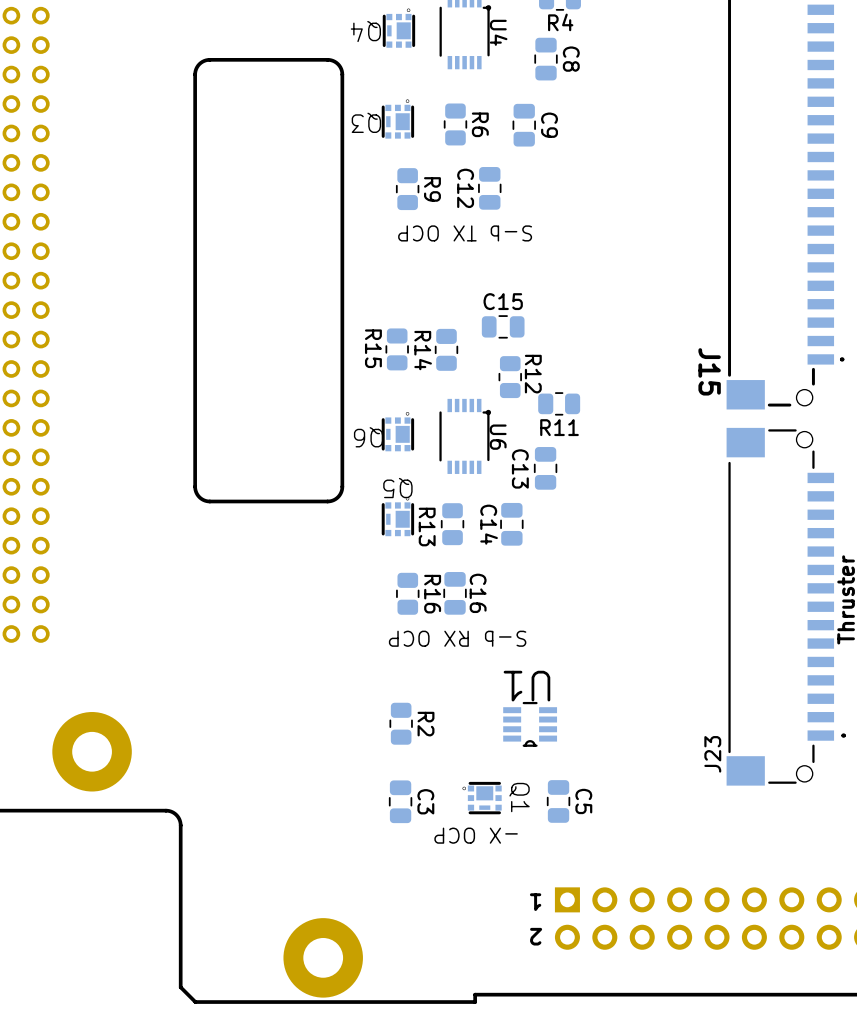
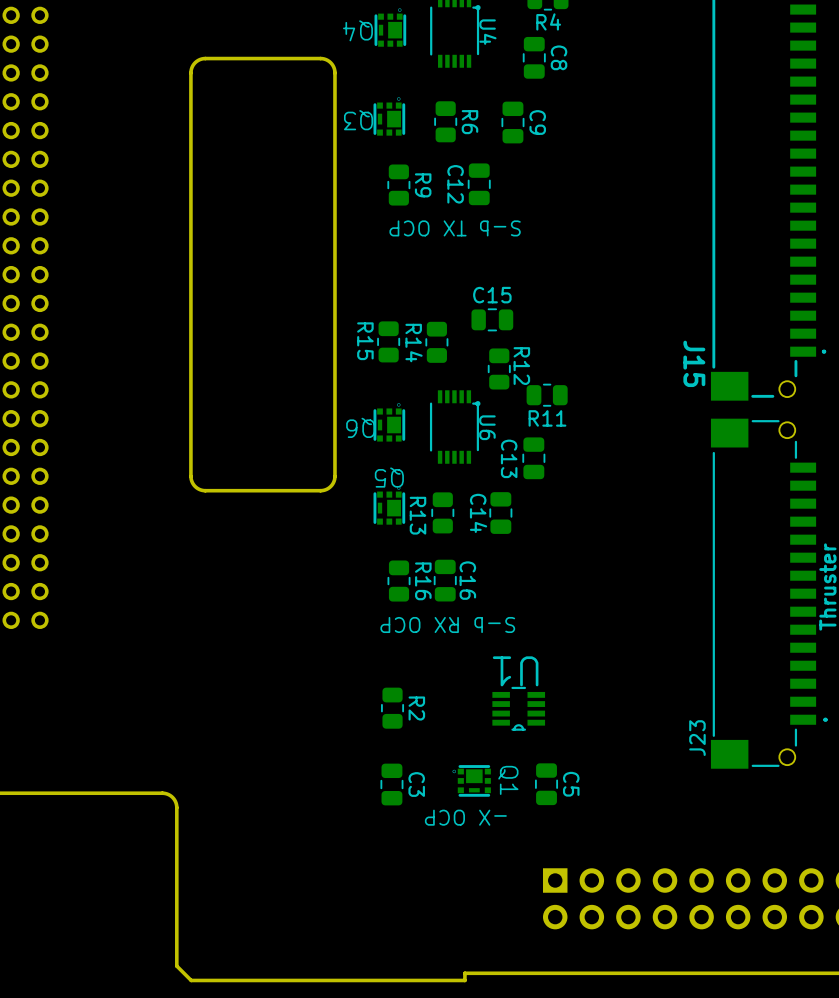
part: (92, 751) -> none
text: 1 (535, 902) -> none
text: 2 (536, 936) -> none
part: (323, 957) -> none

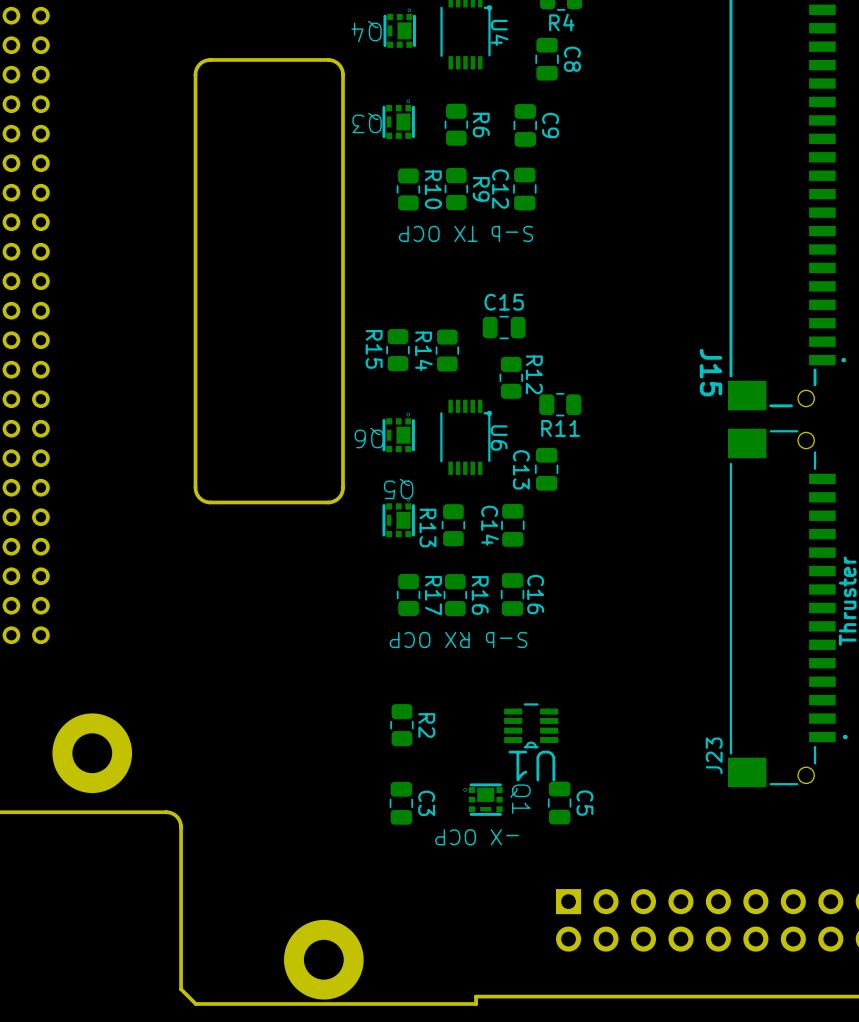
R9: none -> (456, 189)
C12 position: (479, 184) -> (524, 189)
R9 name: R9 (423, 185) -> R10 (433, 189)
C16 position: (445, 580) -> (512, 594)
R16 name: R16 (423, 581) -> R17 (433, 595)
R16: none -> (455, 595)
U1 name position: U1 (515, 671) -> U1 (531, 766)
part: none -> (92, 753)
part: none -> (323, 959)

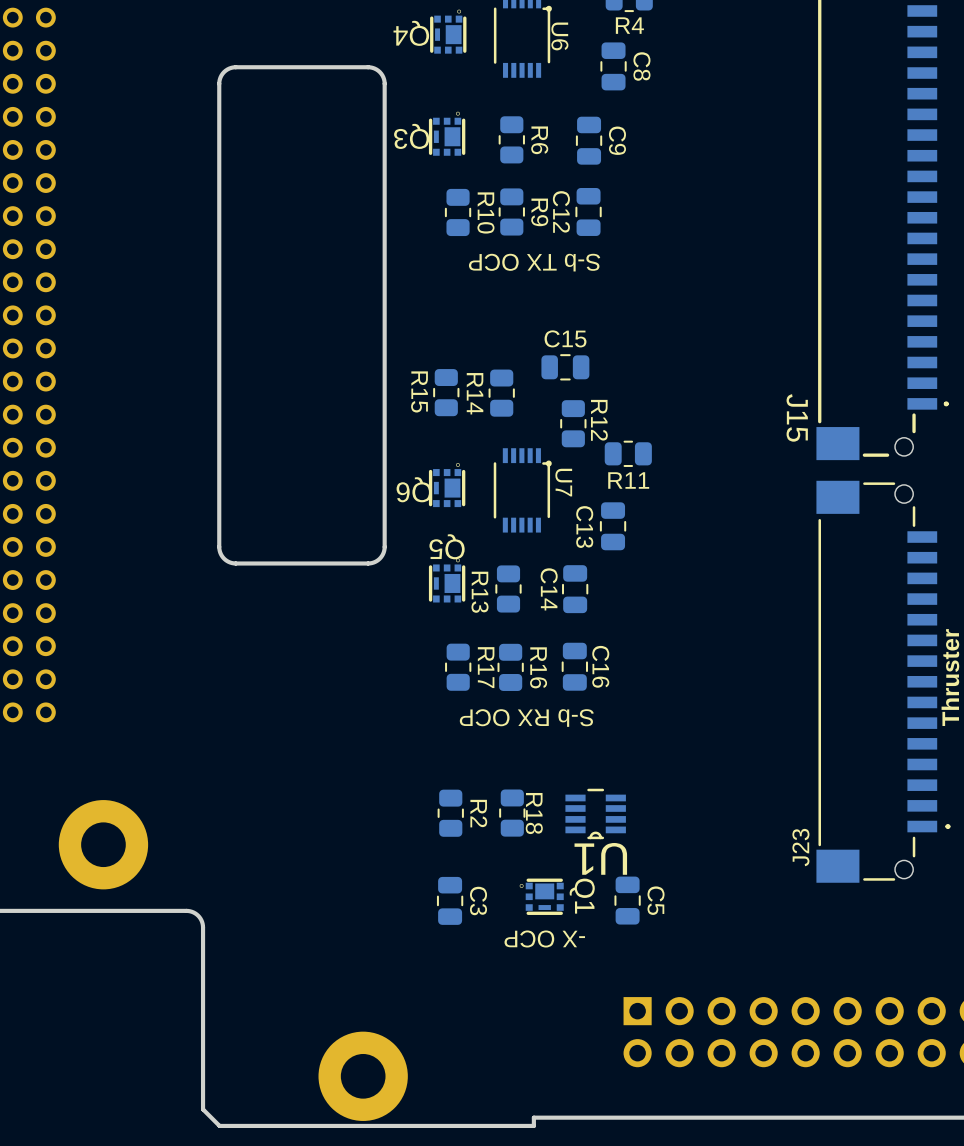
U4 name: U4 (499, 32) -> U6 (559, 36)
U6 name: U6 (499, 437) -> U7 (563, 482)
R18: none -> (512, 813)

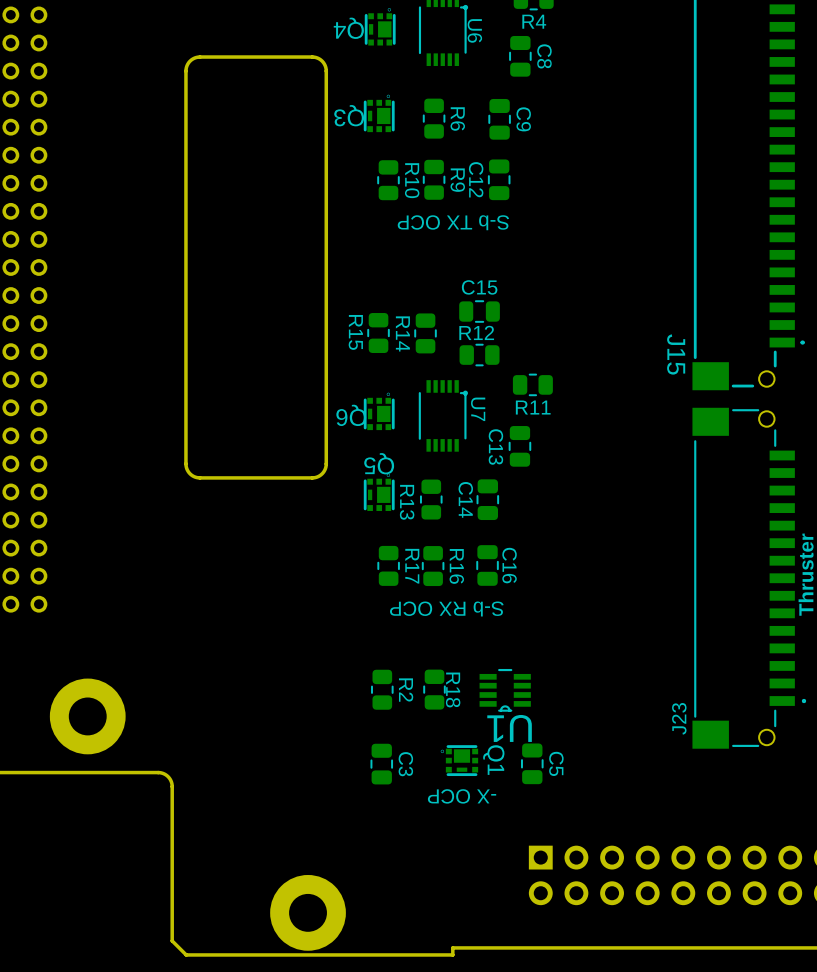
R12 name position: R12 (599, 420) -> R12 (476, 332)
R12 rotation: 0° (573, 423) -> 90° clockwise (479, 355)

